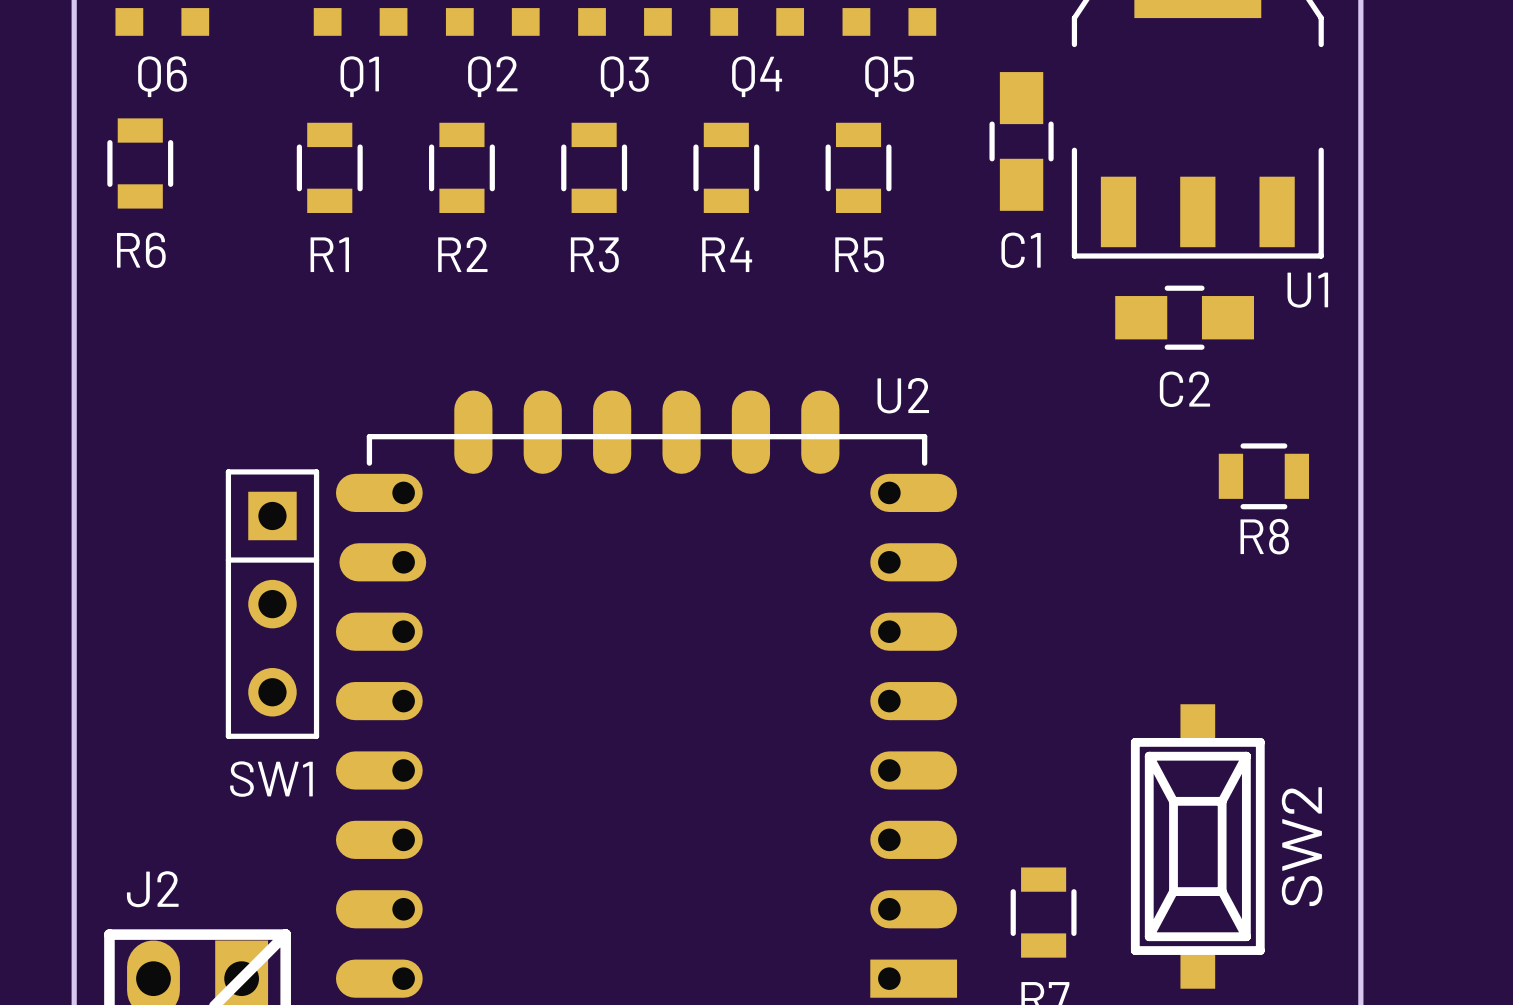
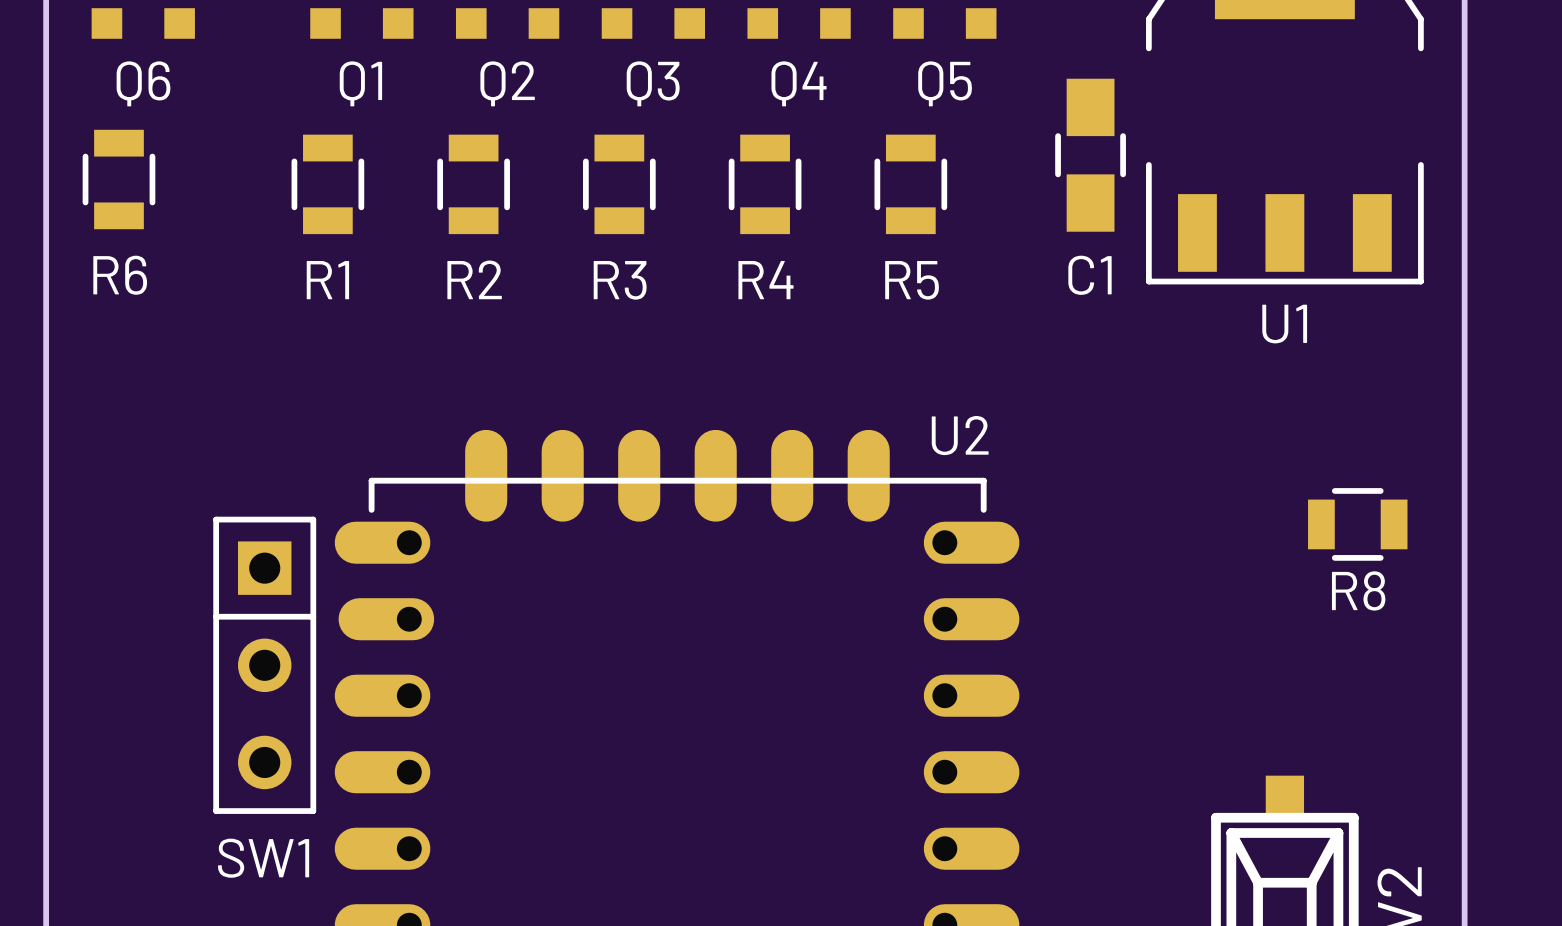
U1 name position: U1 (1307, 290) -> U1 (1284, 324)
C2: (1184, 317) -> none

